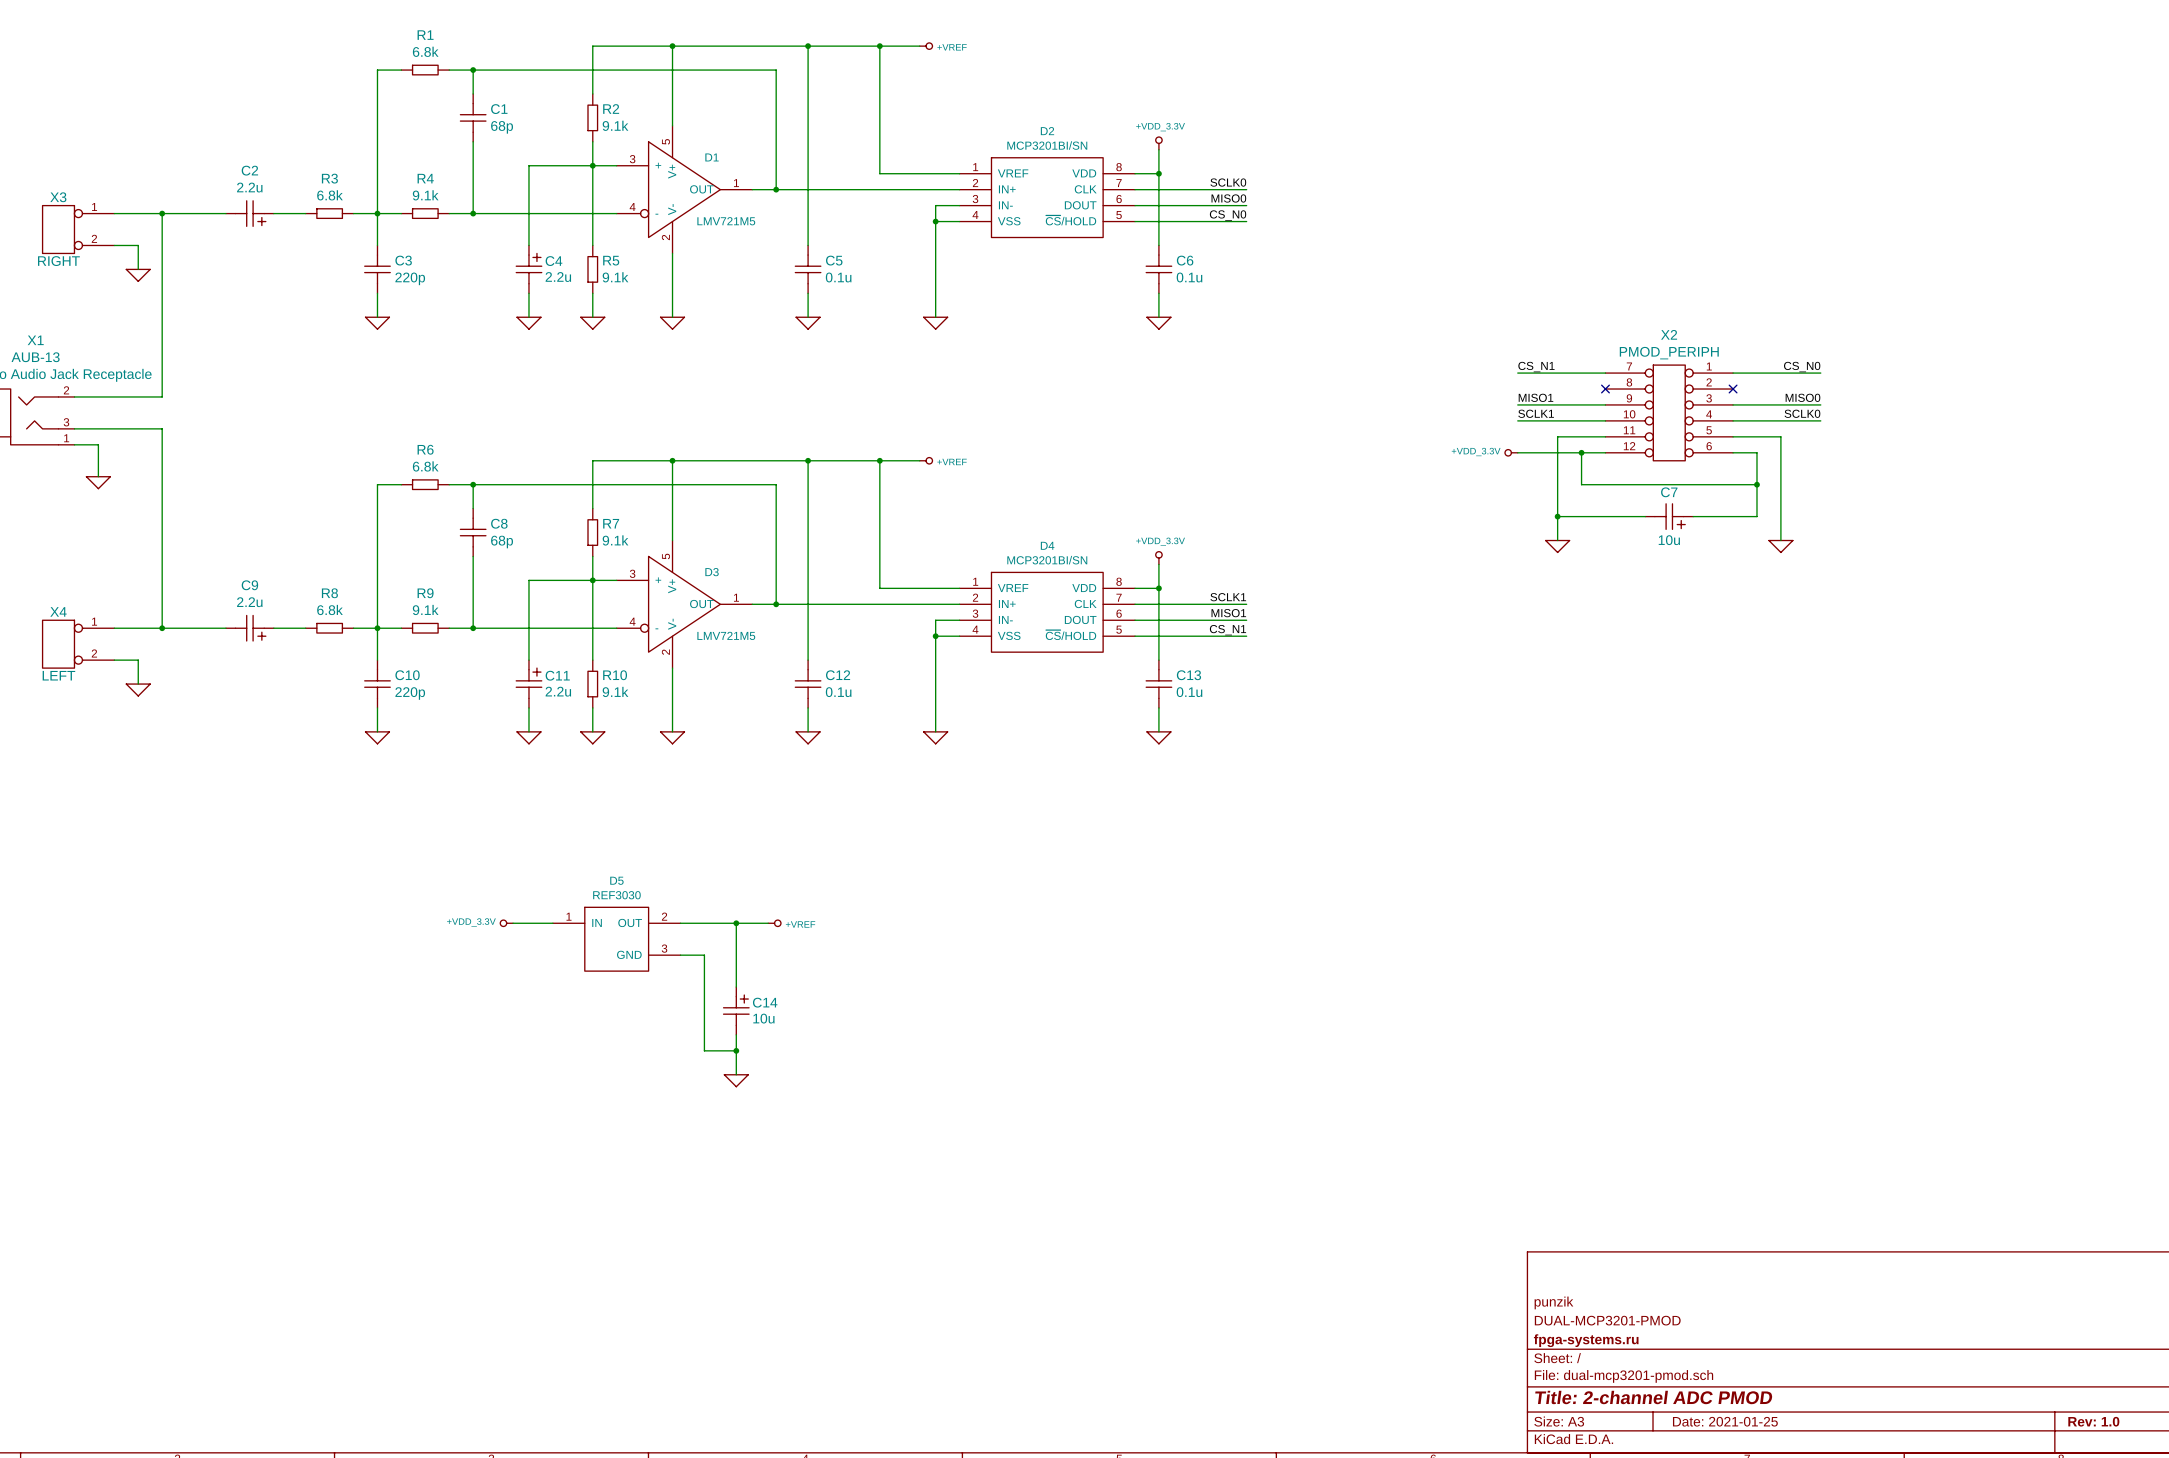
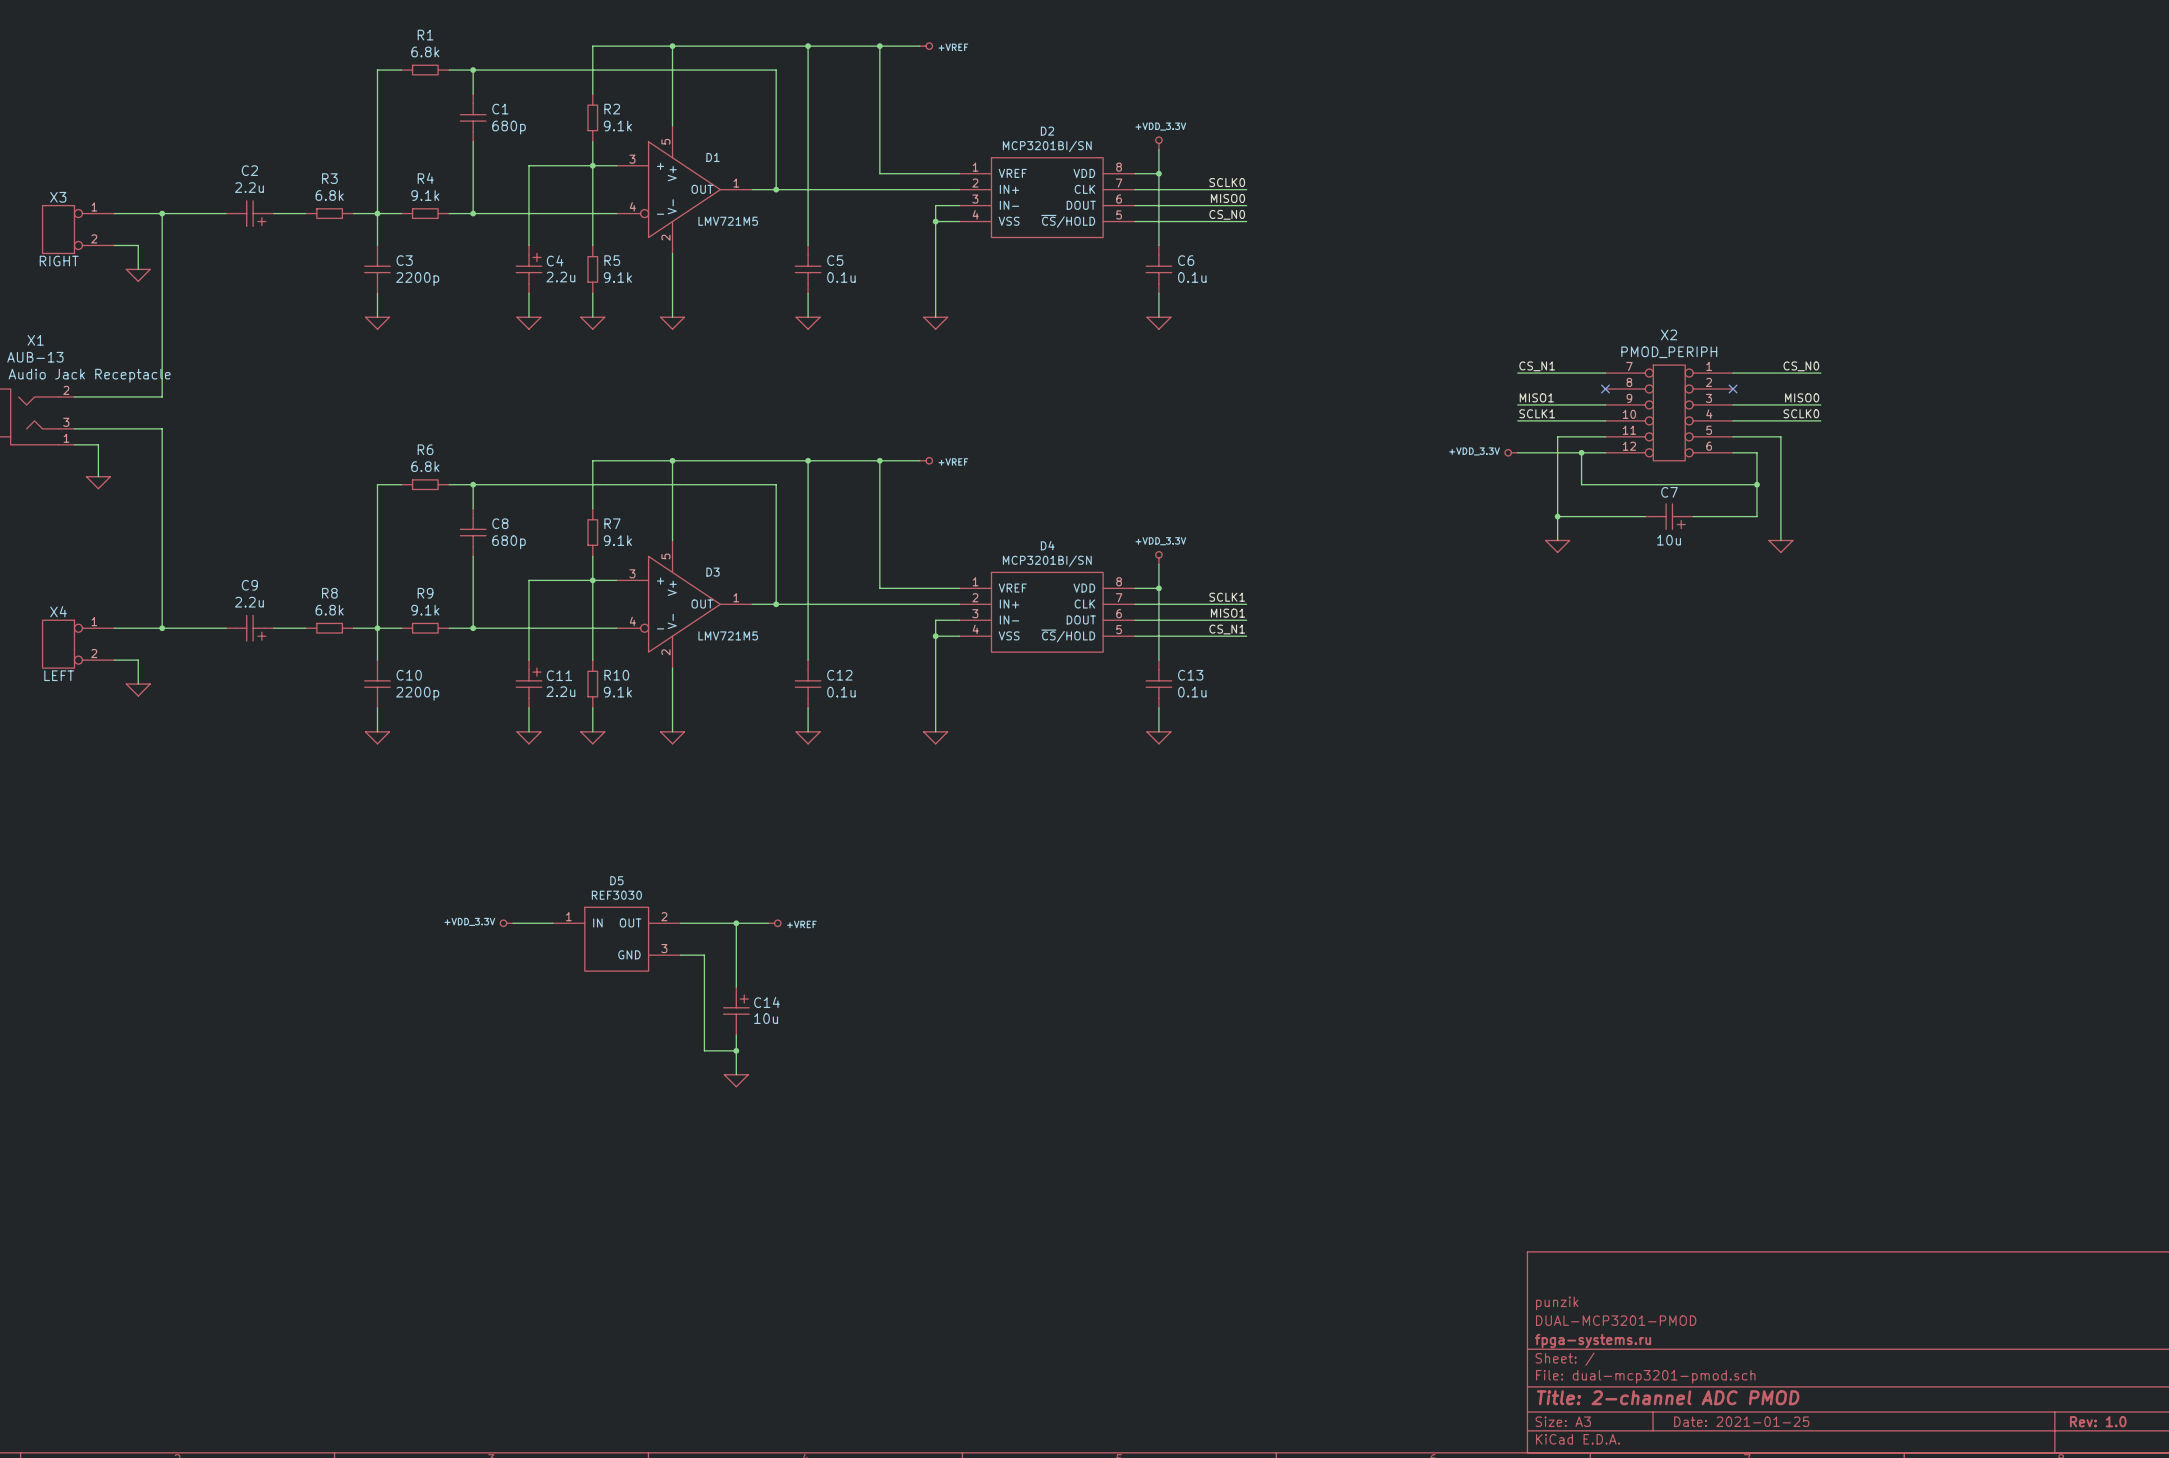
C1 value: 68p (502, 127) -> 680p (509, 127)
C3 value: 220p (410, 278) -> 2200p (417, 279)
C8 value: 68p (502, 542) -> 680p (509, 542)
C10 value: 220p (410, 693) -> 2200p (417, 693)

